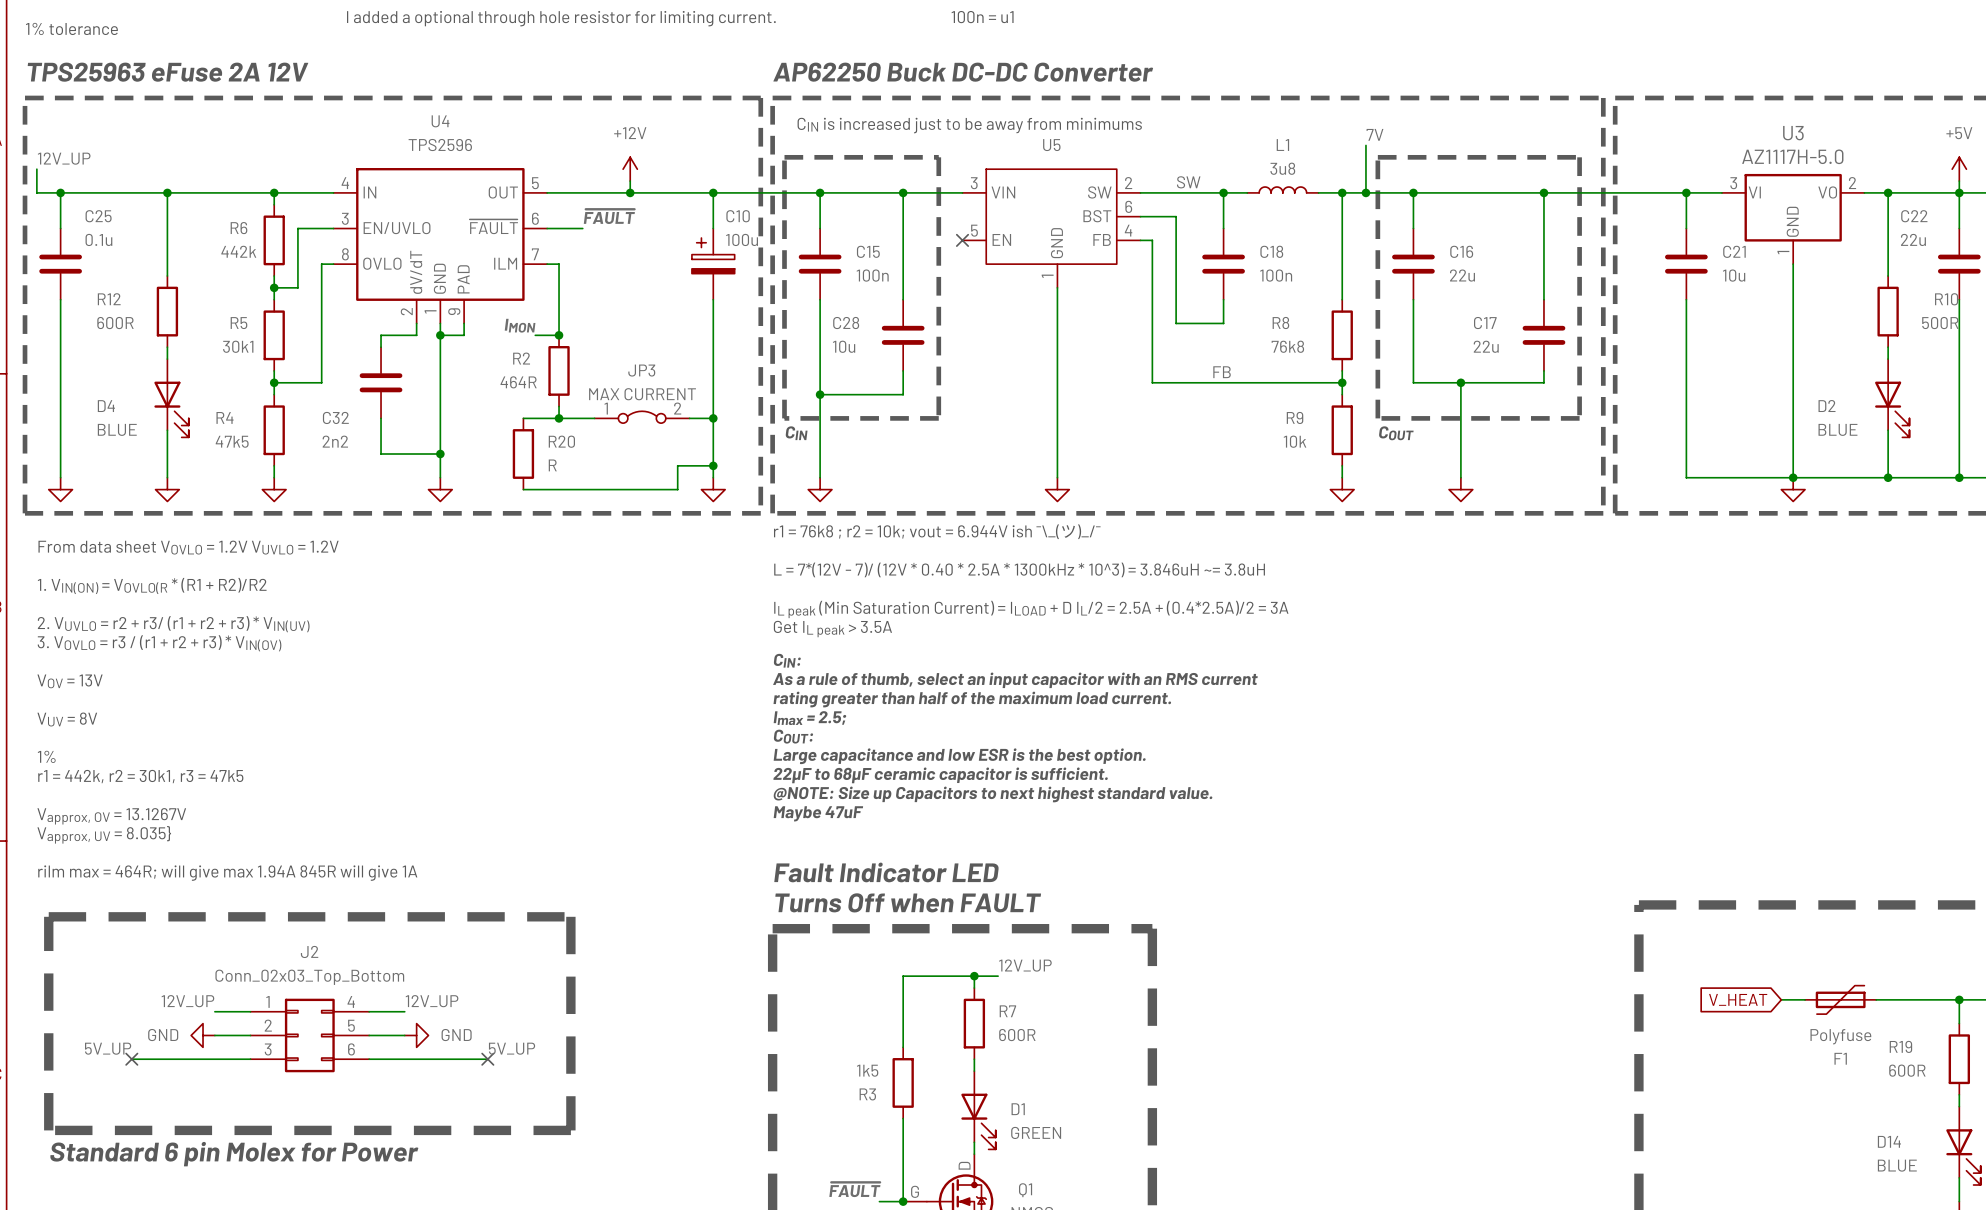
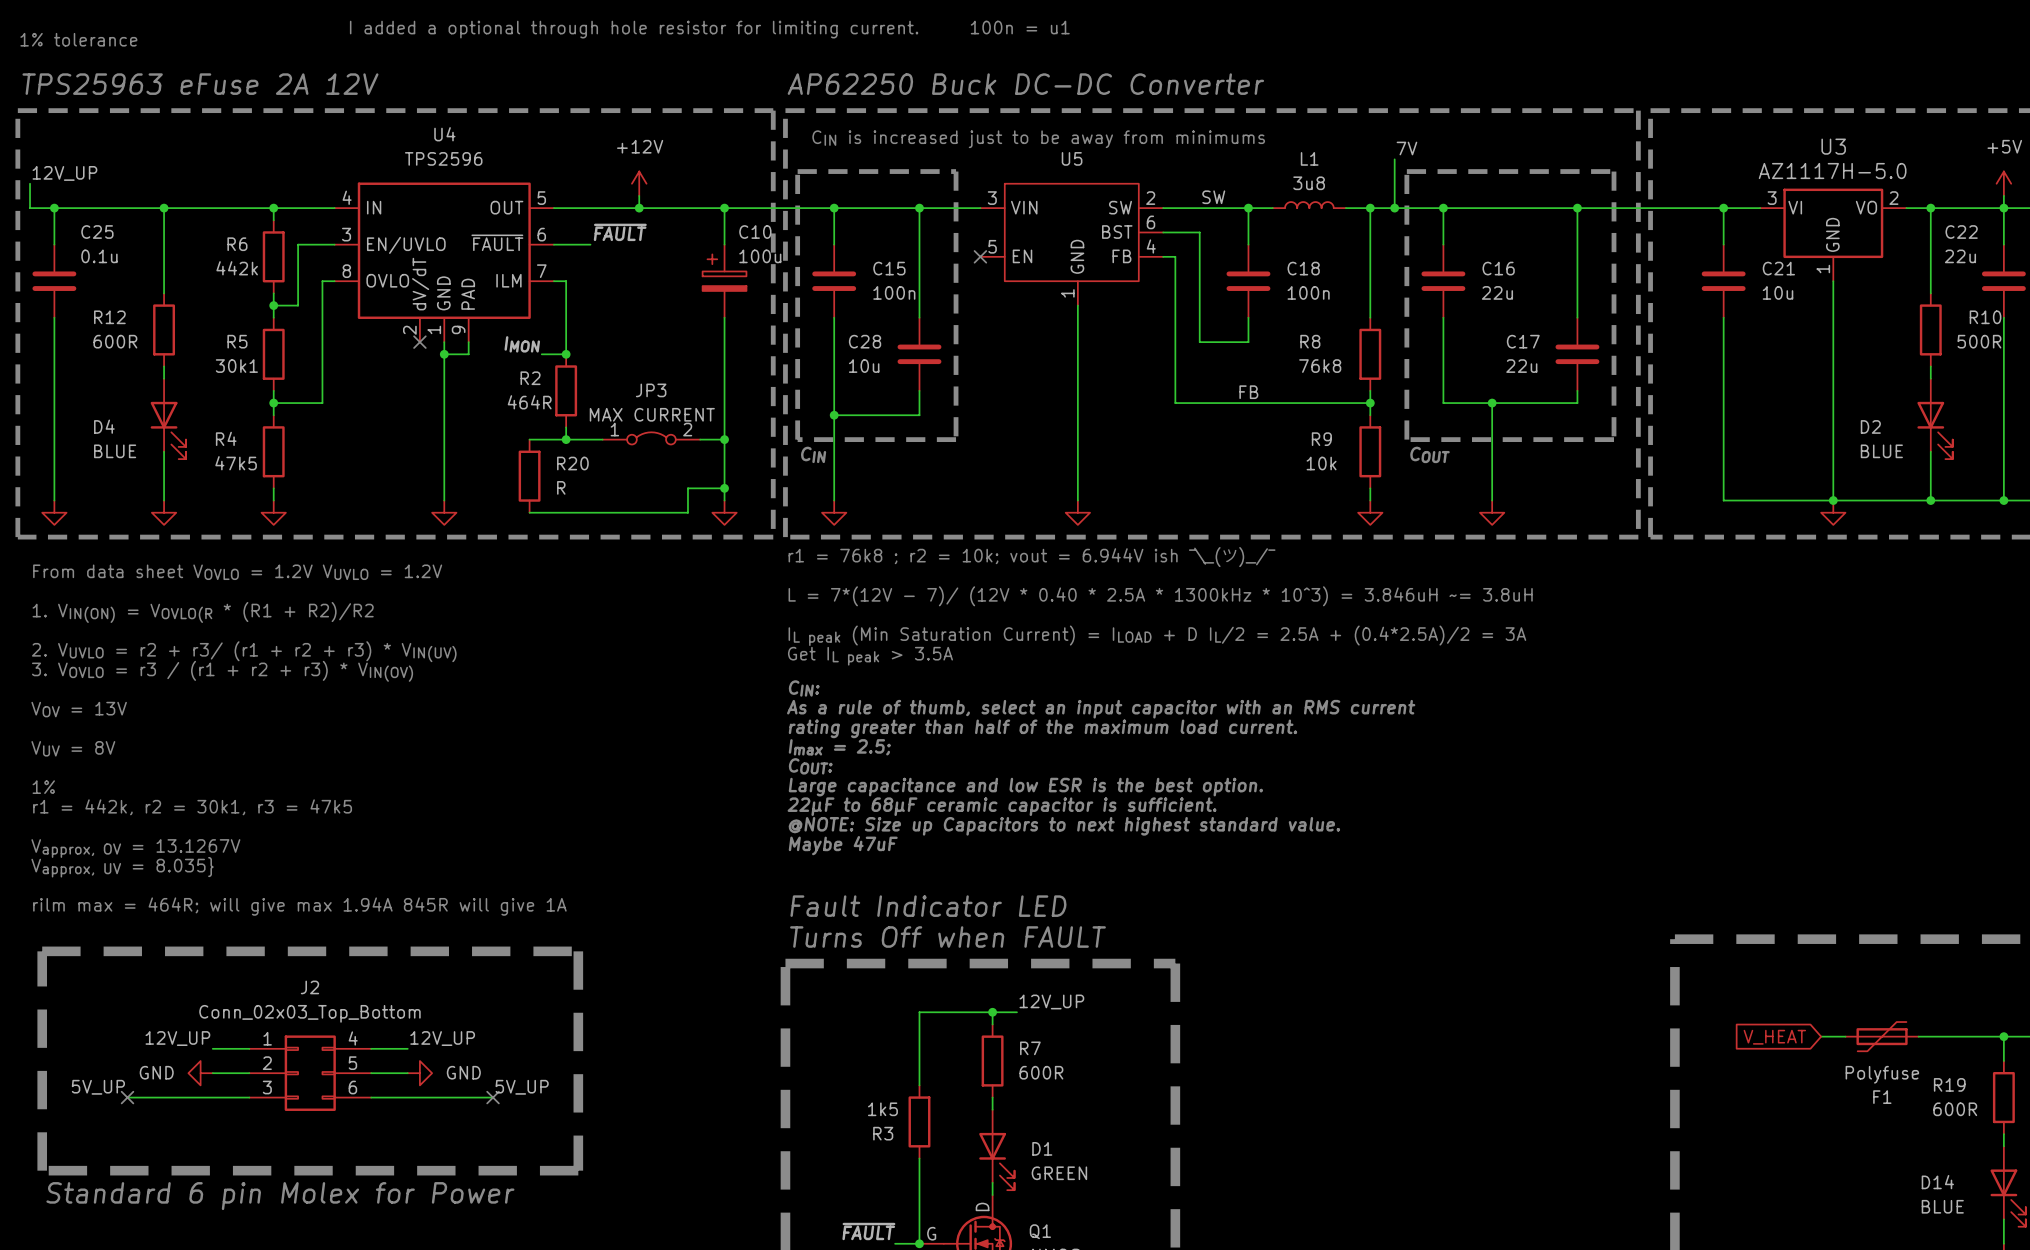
wire: (416, 323) (416, 335) (381, 335) (381, 347) -> none
no-connect mark: none -> (419, 342)
C32: 2n2 (381, 382) -> none
wire: (381, 418) (381, 454) (440, 454) -> none
junction: (440, 454) -> none

